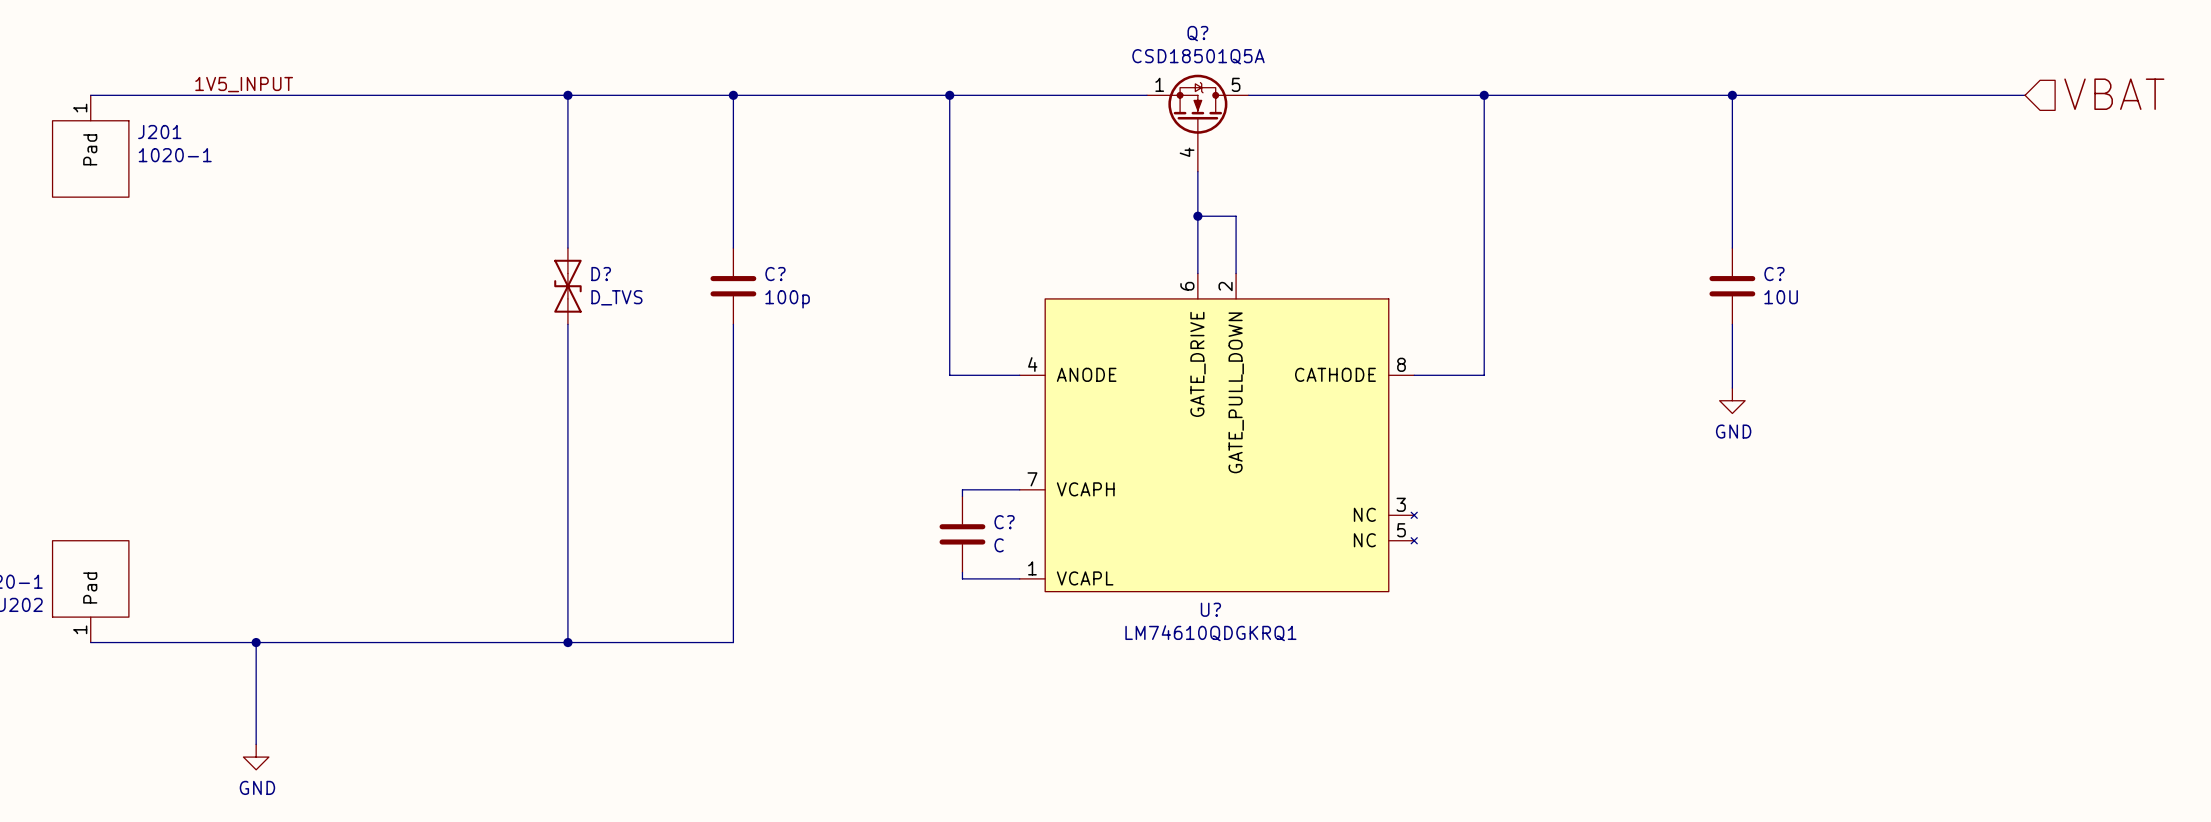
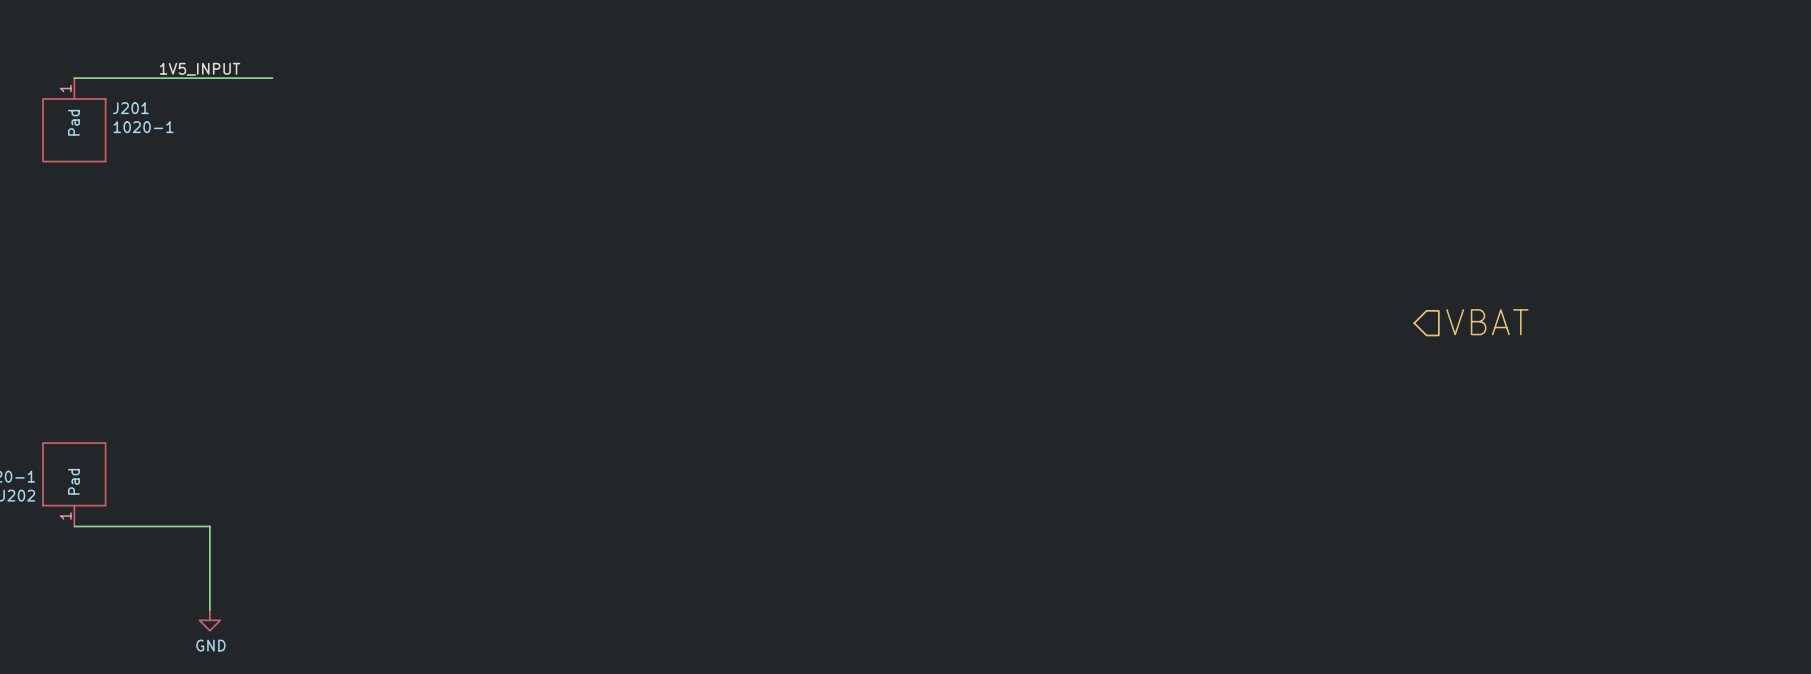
hierarchical label: VBAT (2114, 94) -> none
wire: (332, 95) (1146, 95) -> none
wire: (567, 95) (567, 248) -> none
junction: (567, 95) -> none
wire: (733, 95) (733, 248) -> none
junction: (733, 95) -> none
wire: (949, 95) (949, 375) (1019, 375) -> none
junction: (949, 95) -> none
wire: (1248, 95) (2025, 95) -> none
wire: (1484, 95) (1484, 375) (1414, 375) -> none
junction: (1484, 95) -> none
wire: (1732, 95) (1732, 248) -> none
junction: (1732, 95) -> none
Q?: CSD18501Q5A (1197, 123) -> none
wire: (1197, 171) (1197, 273) -> none
wire: (1197, 216) (1236, 216) (1236, 273) -> none
junction: (1197, 216) -> none
D?: D_TVS (567, 286) -> none
C?: 100p (733, 286) -> none
C?: 10U (1732, 286) -> none
wire: (567, 324) (567, 642) -> none
wire: (733, 324) (733, 642) (256, 642) -> none
wire: (1732, 324) (1732, 388) -> none
hierarchical label: none -> VBAT (1487, 322)
power symbol: GND (1732, 400) -> none
U?: LM74610QDGKRQ1 (1218, 432) -> none
wire: (1019, 489) (962, 489) (962, 496) -> none
C?: C (962, 534) -> none
wire: (962, 572) (962, 578) (1019, 578) -> none
junction: (256, 642) -> none
junction: (567, 642) -> none

